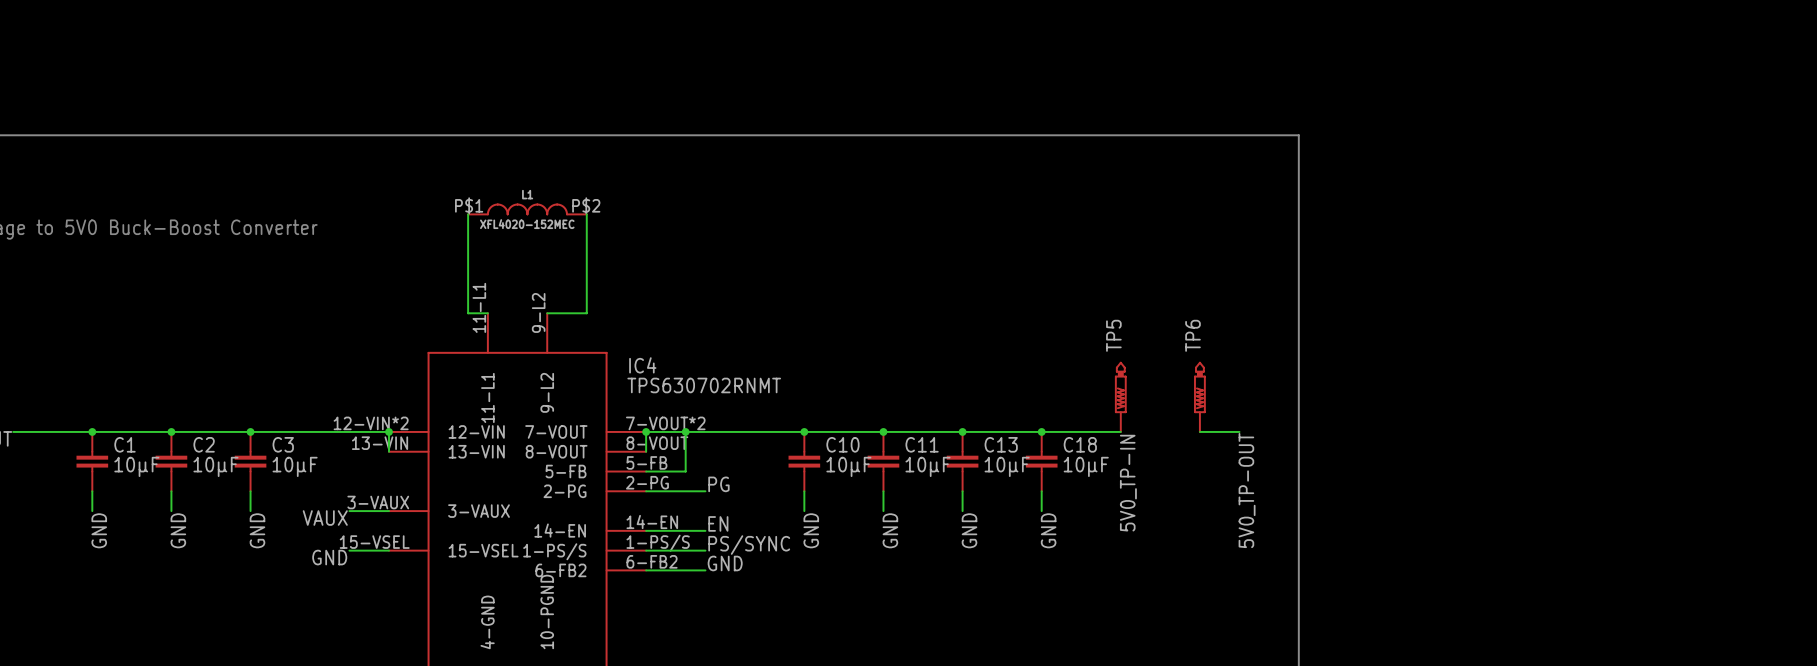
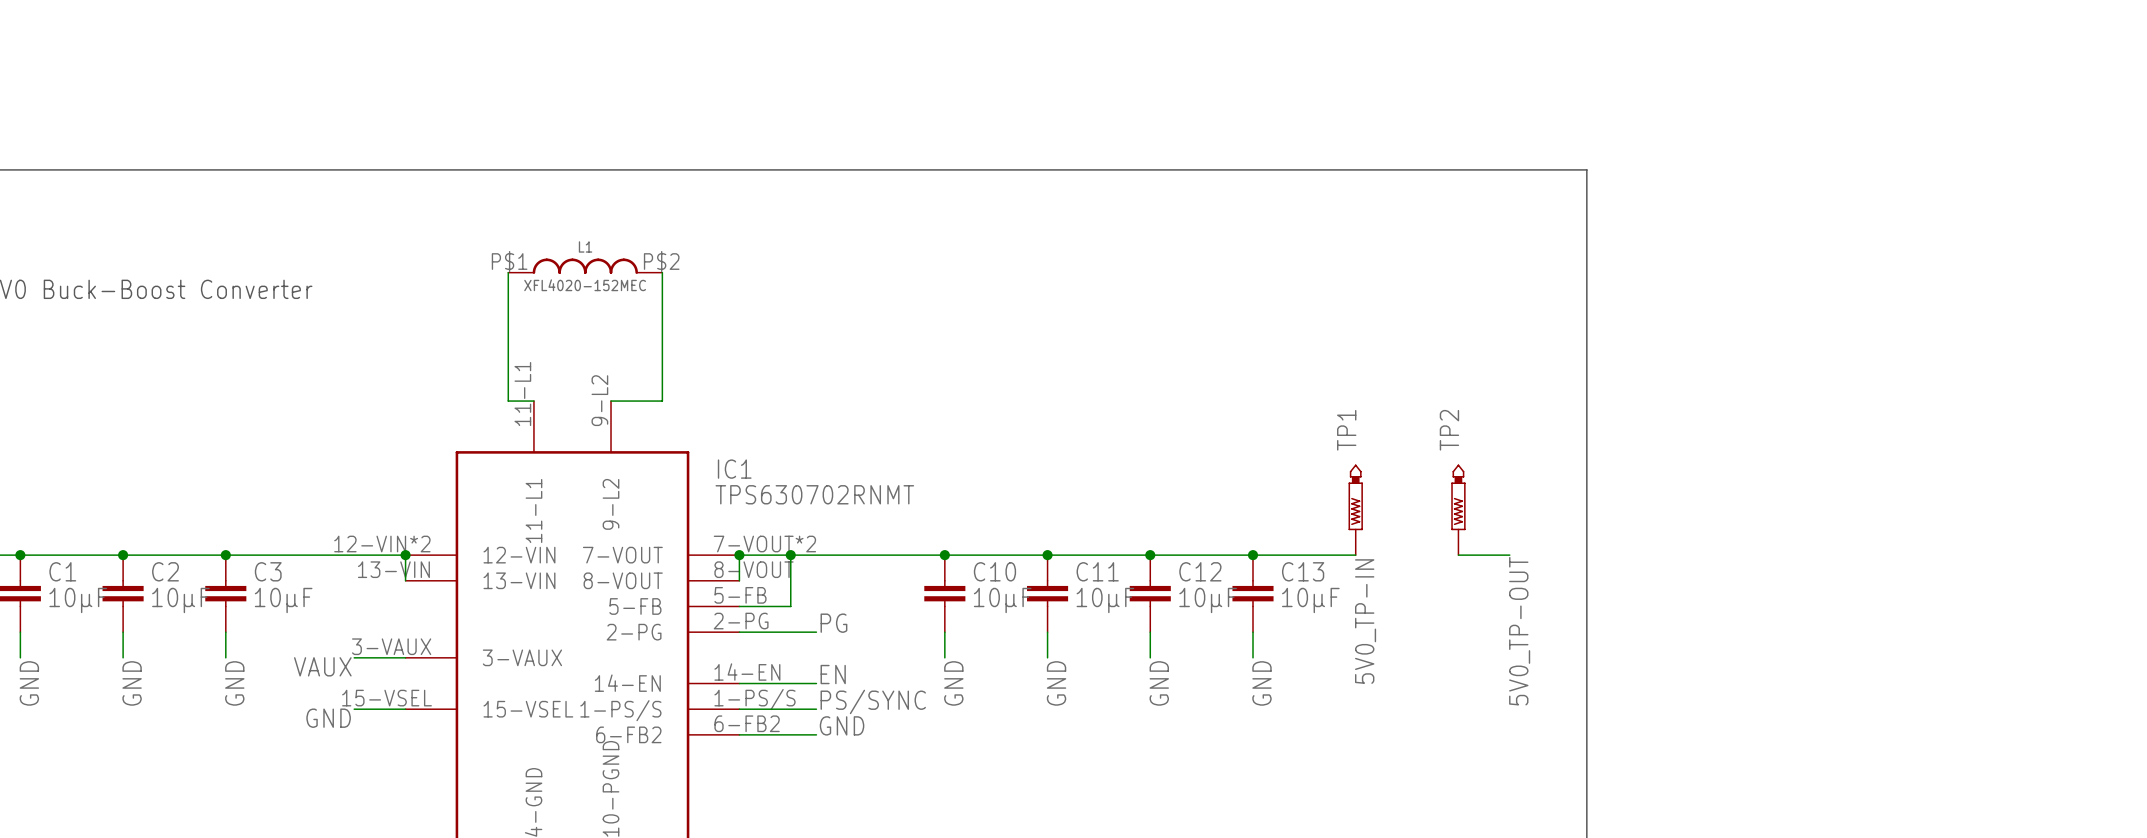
TP5 name: TP5 (1113, 335) -> TP1 (1346, 430)
TP6 name: TP6 (1193, 335) -> TP2 (1449, 430)
IC4 name: IC4 (642, 365) -> IC1 (734, 469)
C13 name: C13 (1001, 444) -> C12 (1200, 571)
C18 name: C18 (1080, 444) -> C13 (1303, 571)

